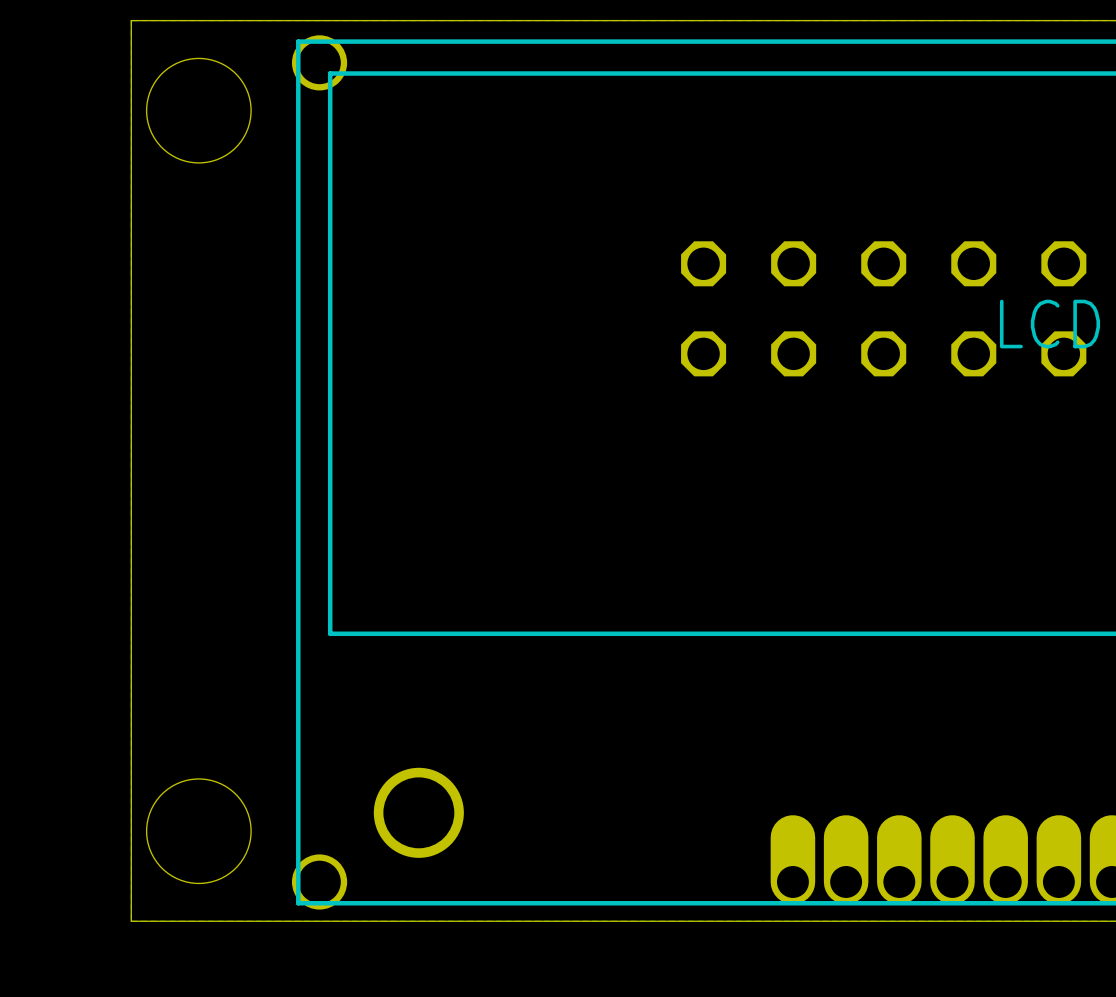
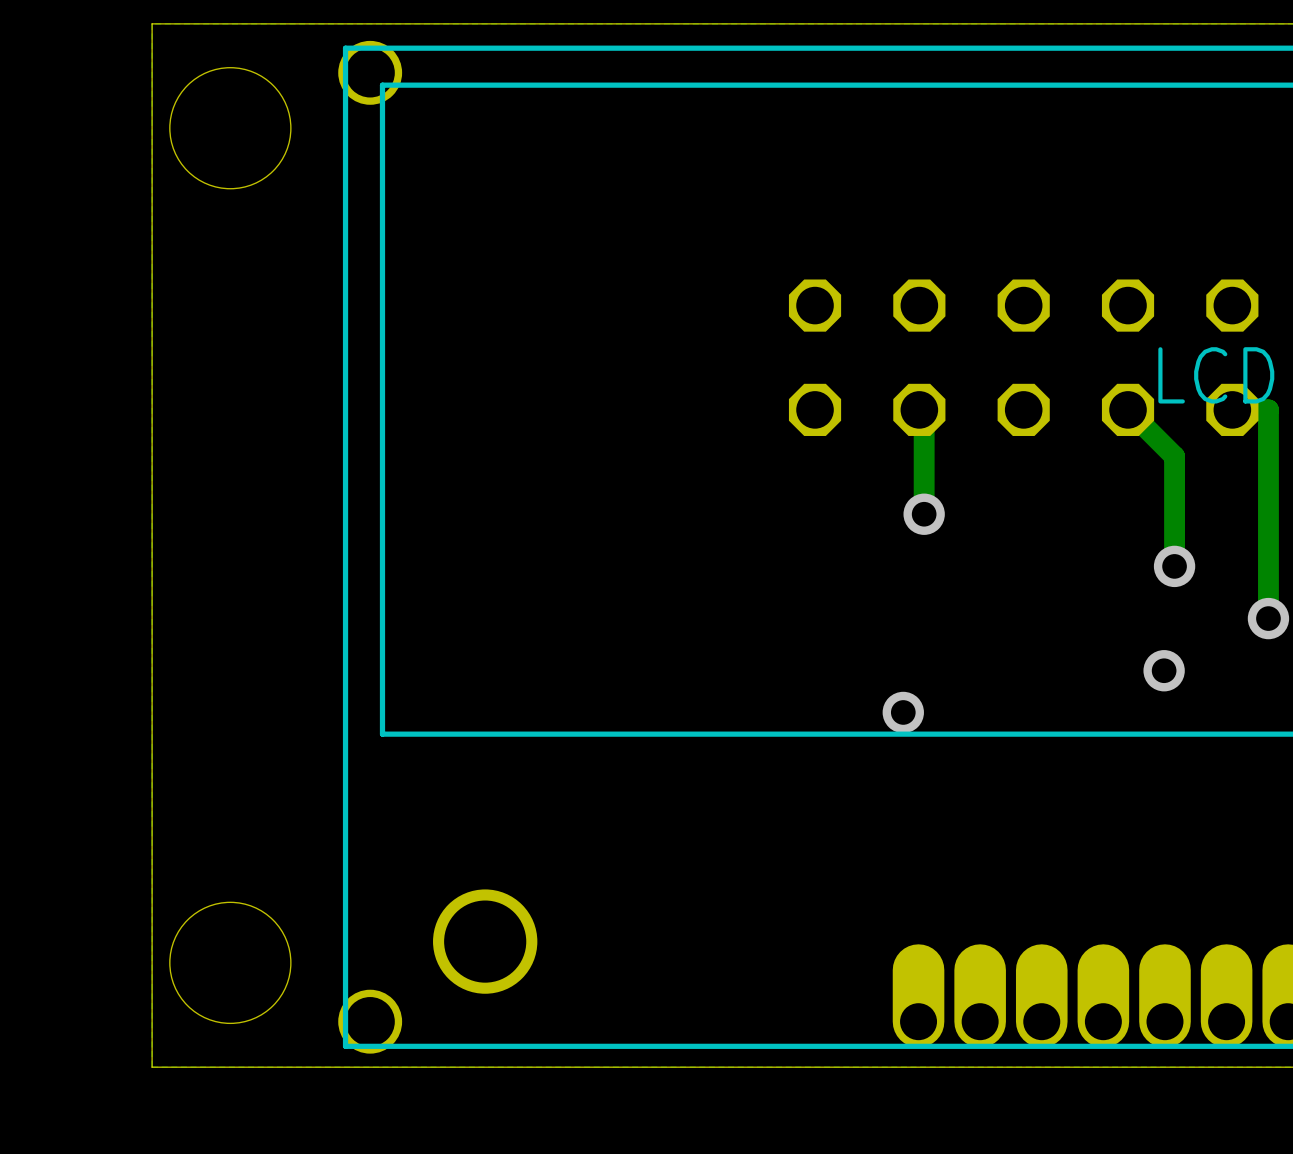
track: none -> (919, 409) (924, 414) (924, 514)
track: none -> (1128, 409) (1174, 456) (1174, 566)
track: none -> (1232, 409) (1268, 409) (1268, 618)
via: none -> (924, 514)
via: none -> (1174, 566)
via: none -> (1268, 618)
via: none -> (1164, 670)
via: none -> (903, 712)

